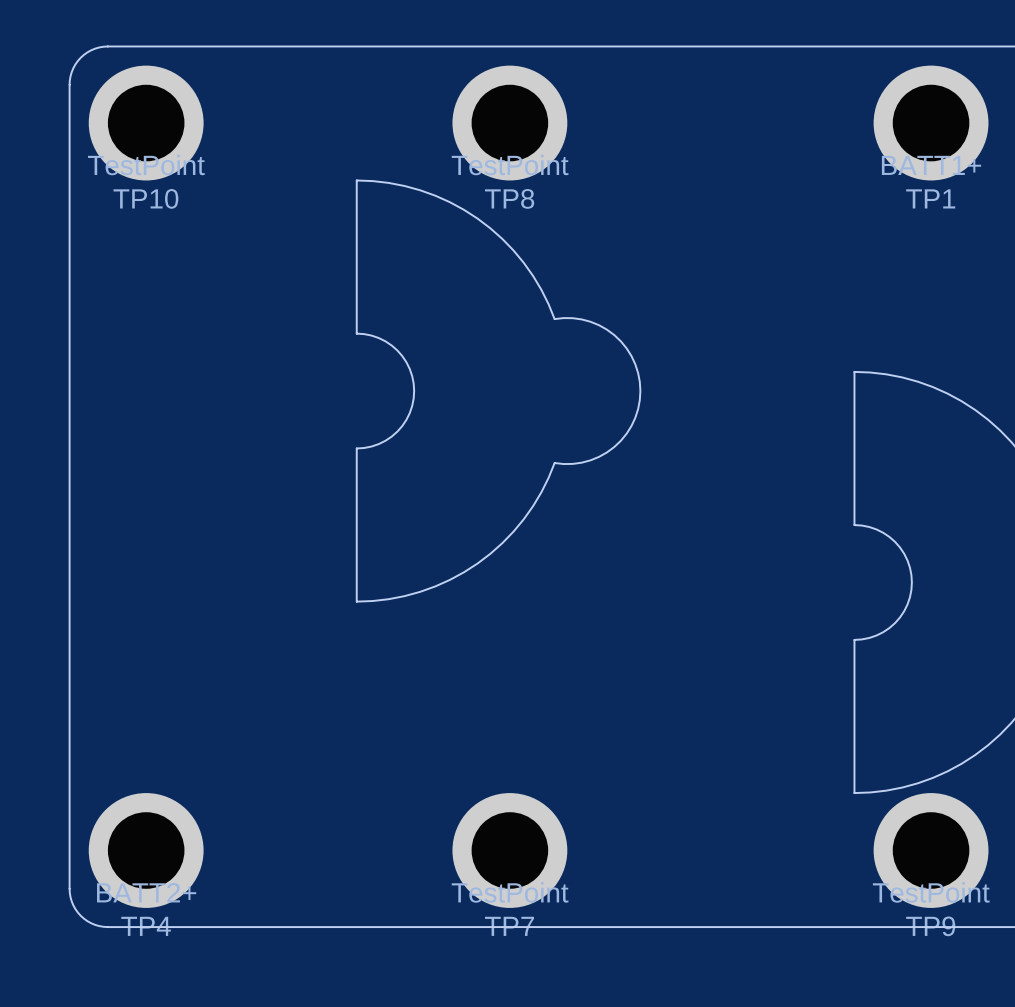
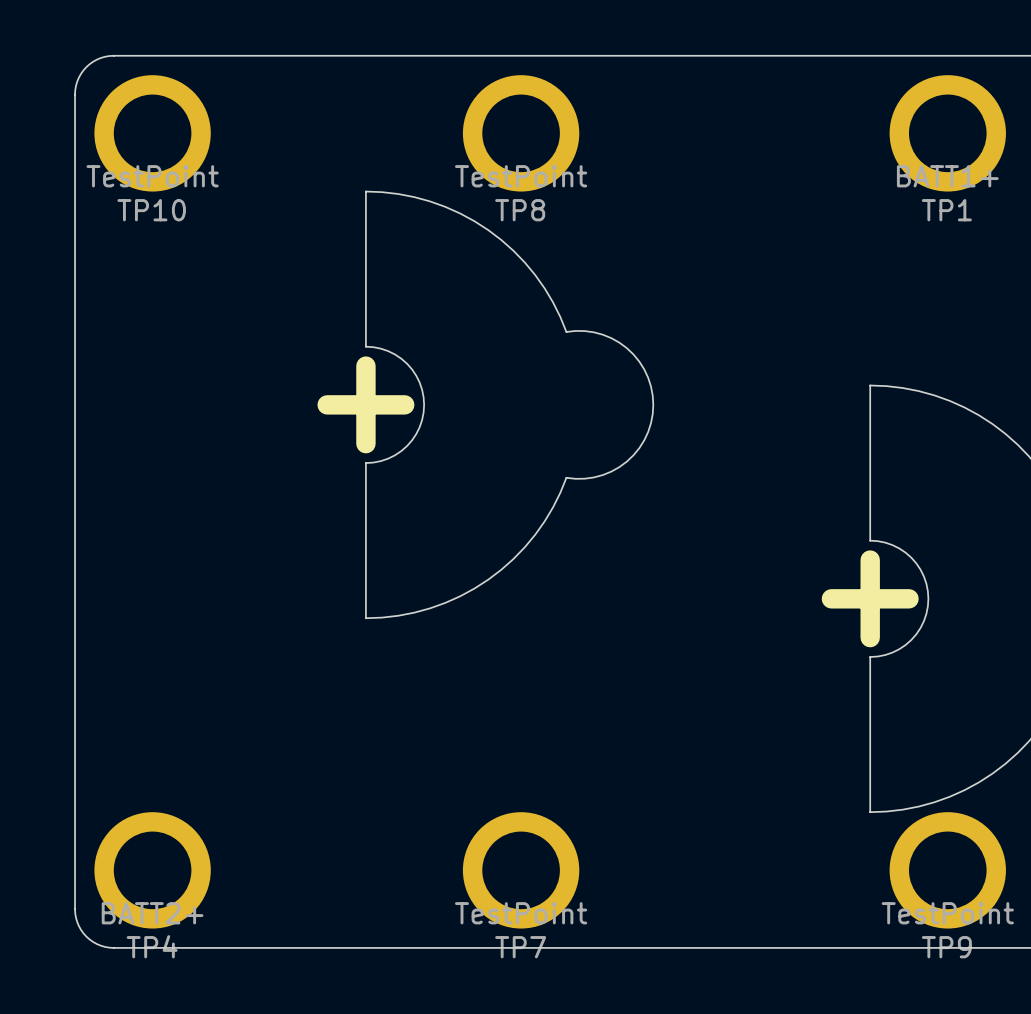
line: none -> (365, 366) (365, 443)
line: none -> (327, 404) (404, 404)
line: none -> (870, 560) (870, 637)
line: none -> (831, 598) (908, 598)

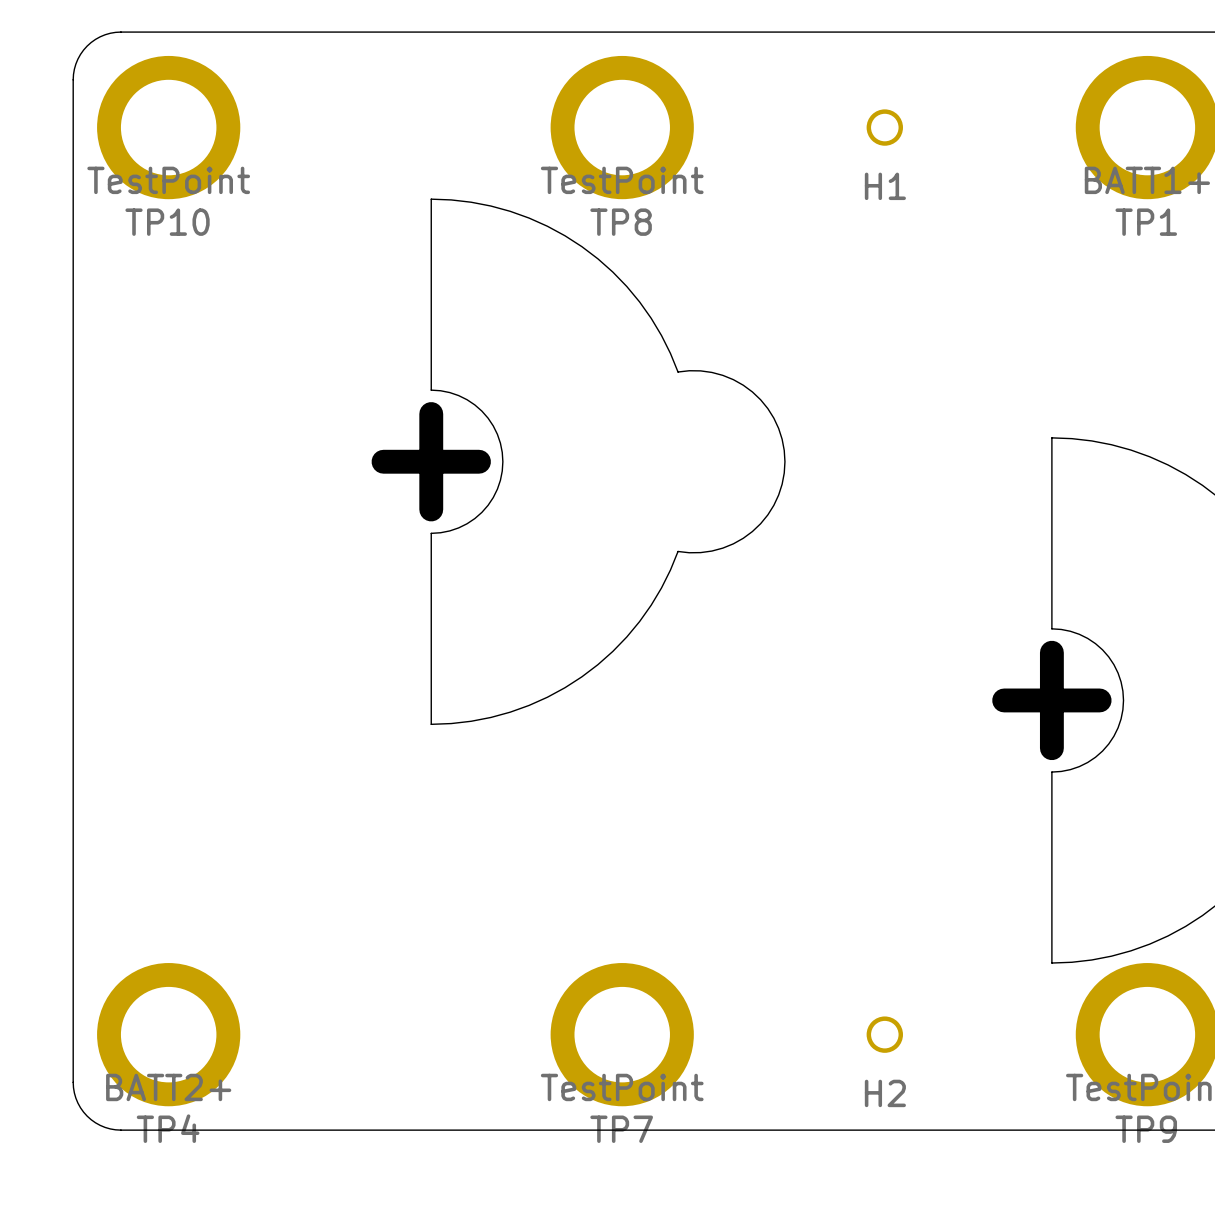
H1: none -> (884, 127)
H2: none -> (884, 1034)

